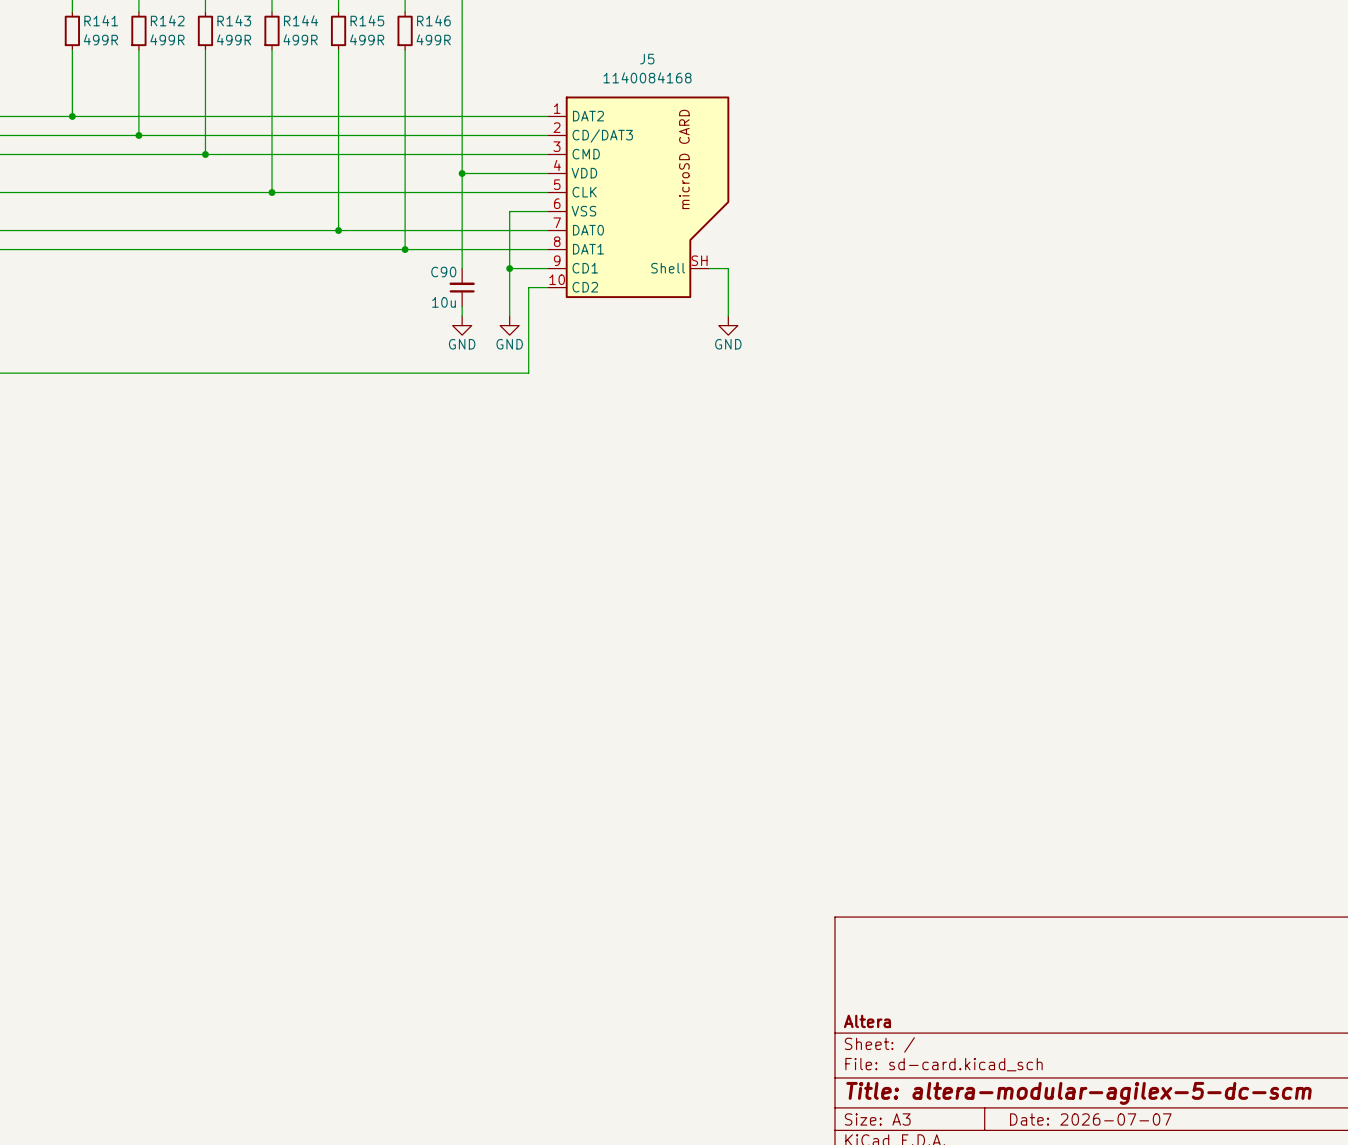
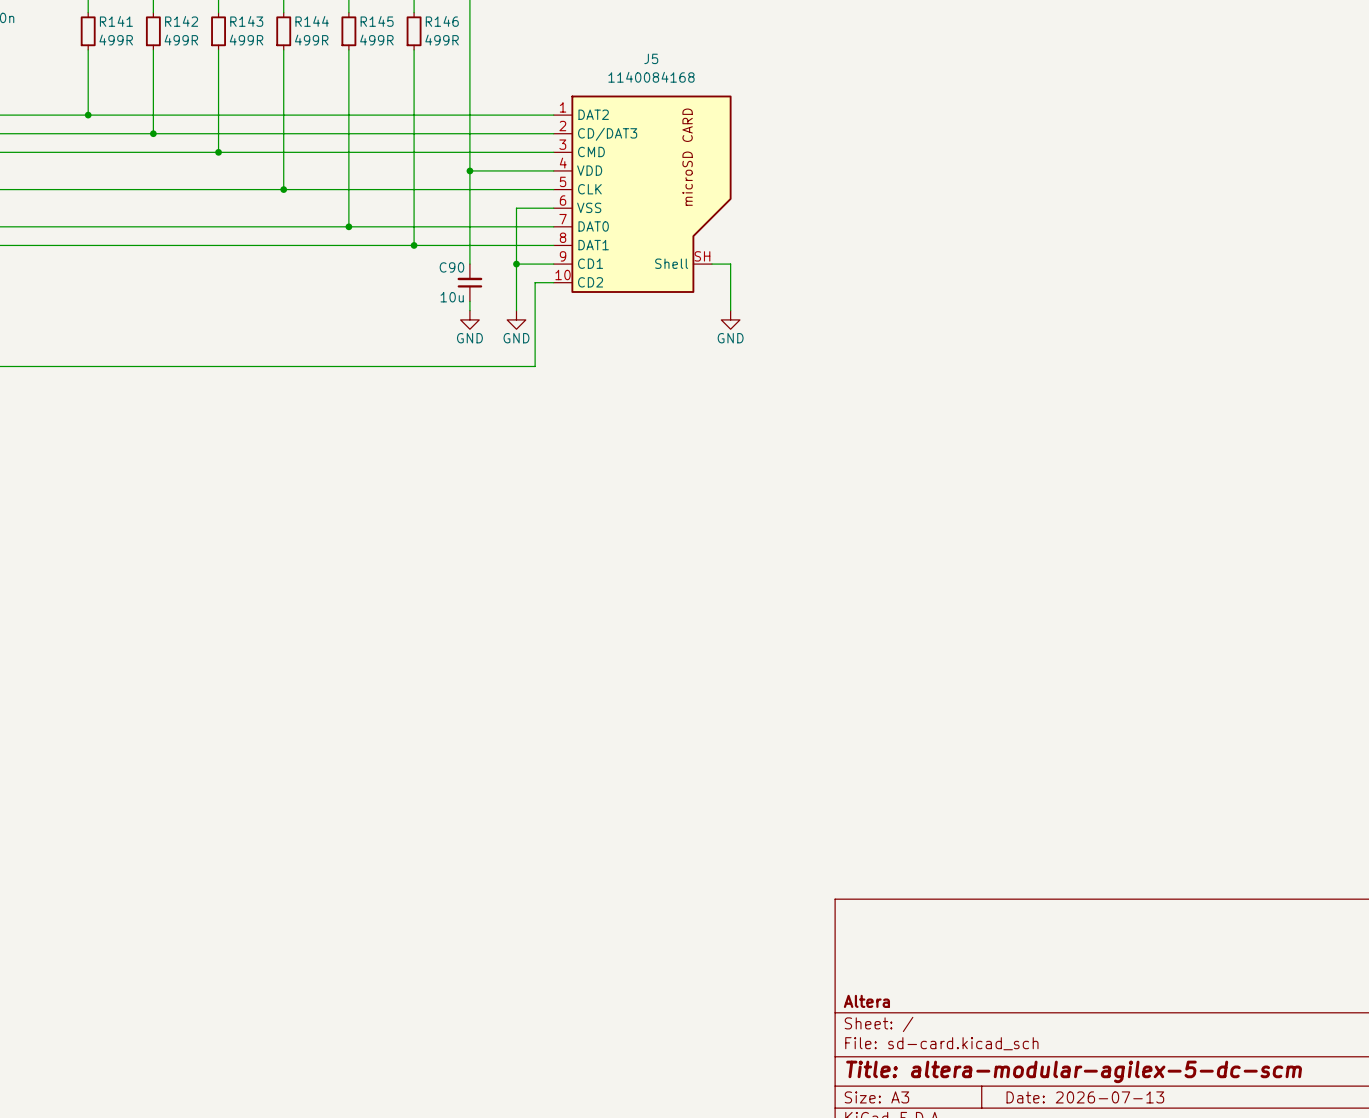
title block: Date: 2026-07-07 (1090, 1119) -> Date: 2026-07-13 (1085, 1097)

